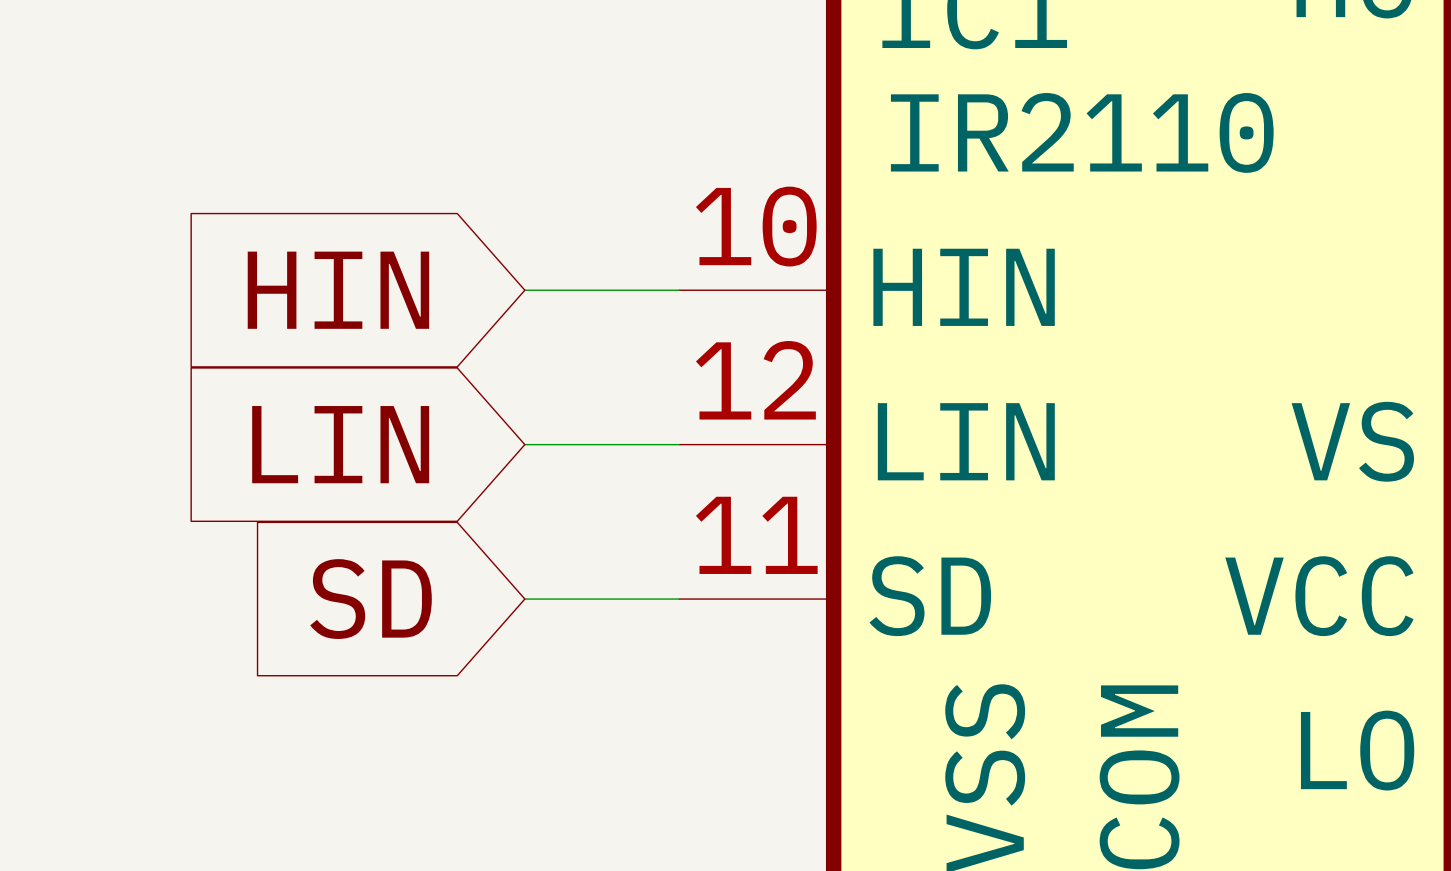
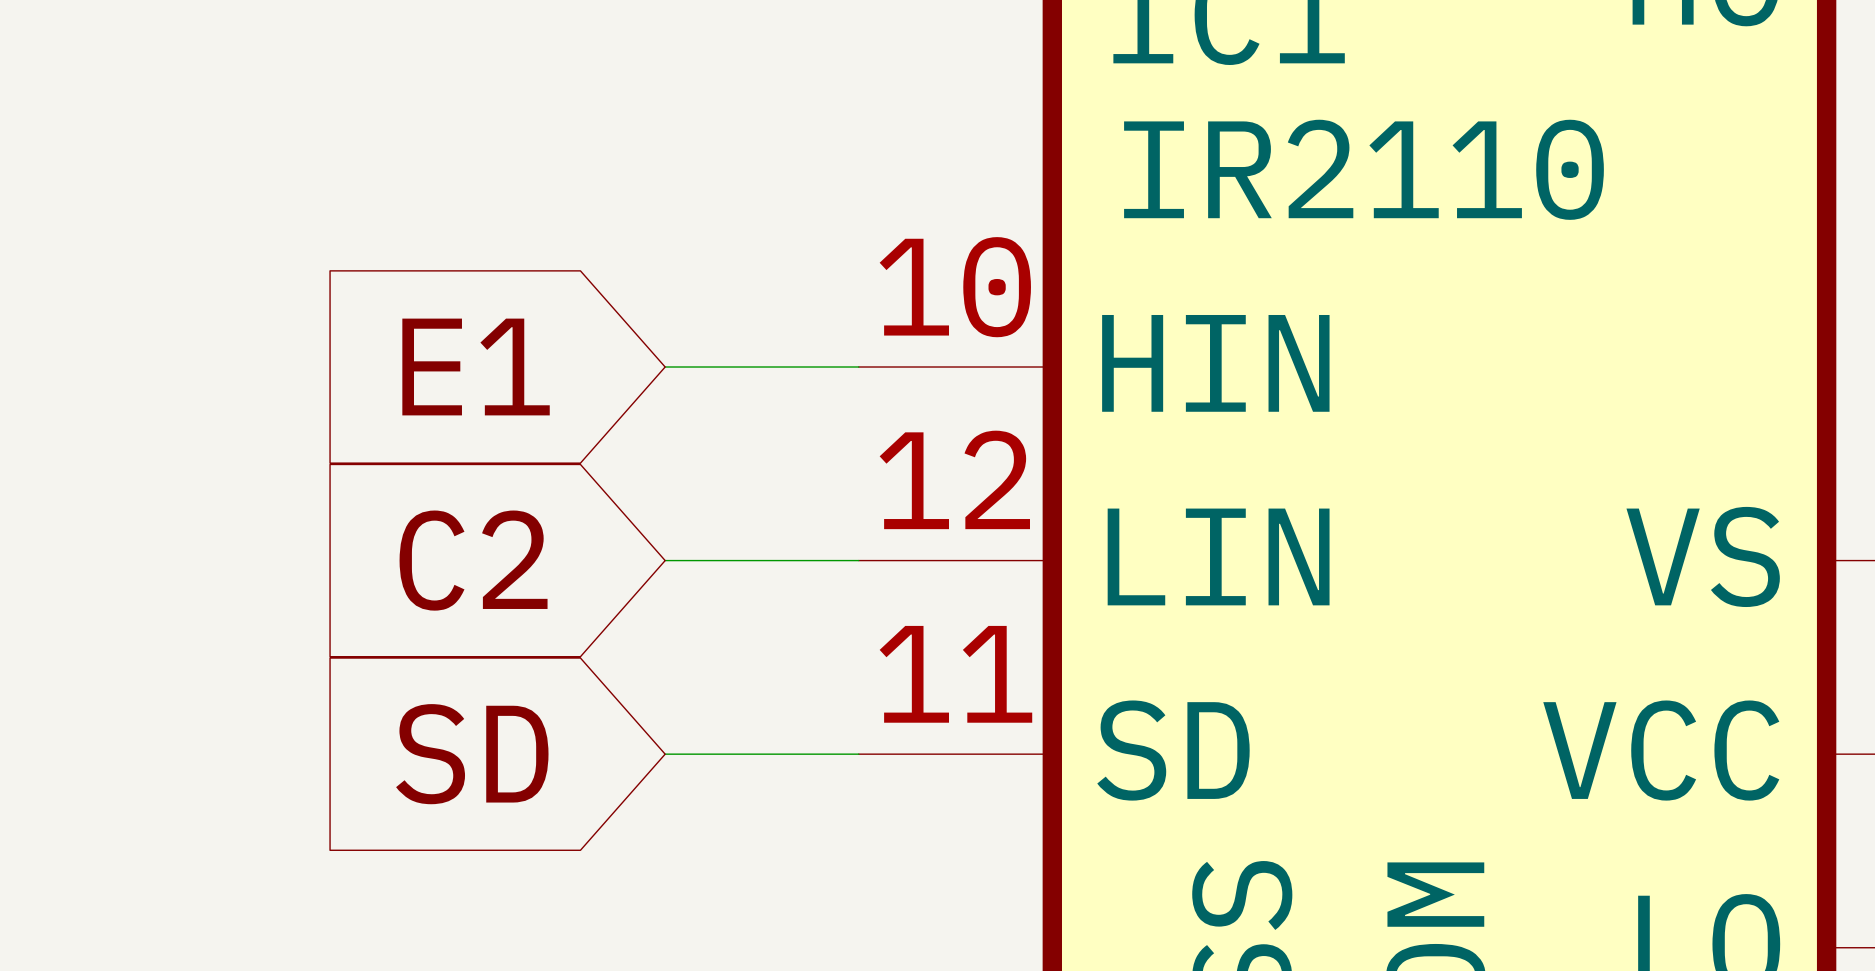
global label: HIN (338, 290) -> E1 (476, 367)
global label: LIN (340, 444) -> C2 (473, 560)

